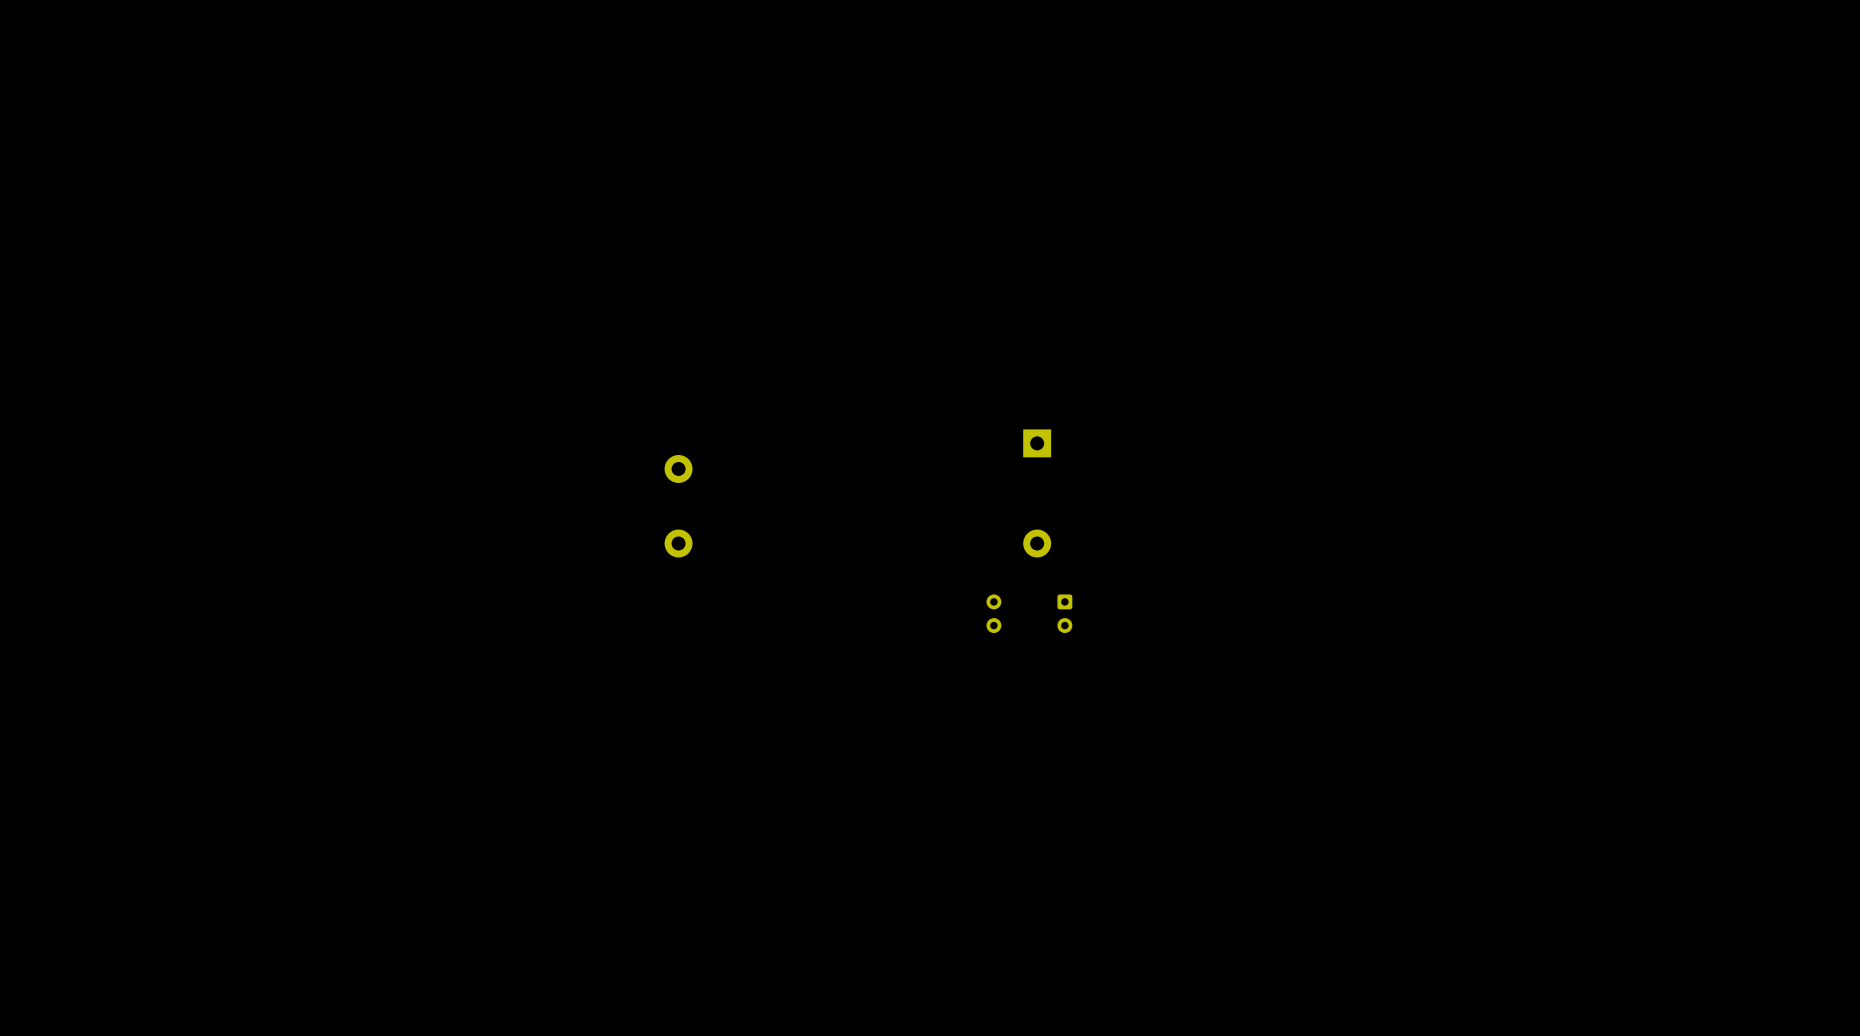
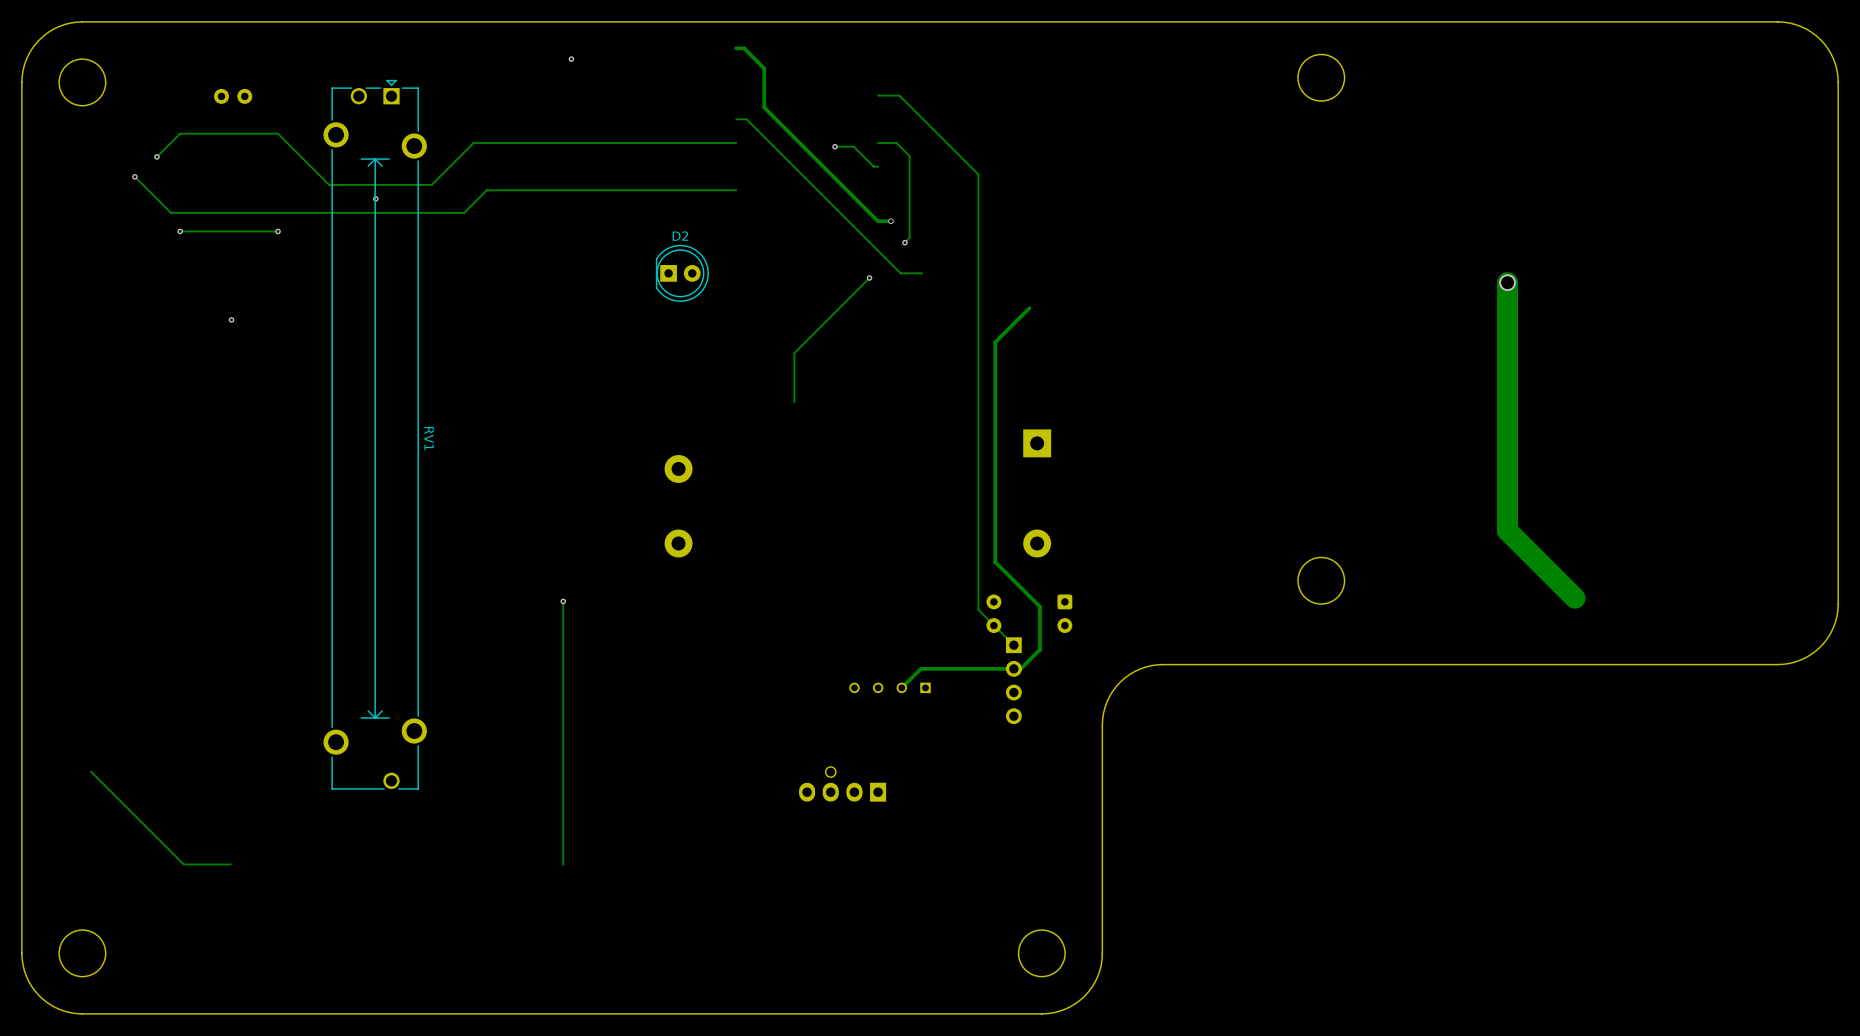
board edge: none -> (1777, 21) (82, 21) (70, 23) (53, 29) (39, 39) (29, 53) (23, 70) (21, 82) (21, 953) (24, 970) (29, 981) (39, 996) (48, 1003) (64, 1011) (82, 1013) (1053, 1012) (1065, 1009) (1080, 1000) (1092, 986) (1099, 970) (1102, 953) (1102, 719) (1106, 701) (1116, 686) (1129, 674) (1139, 669) (1162, 664) (1777, 664) (1789, 663) (1806, 657) (1820, 646) (1828, 637) (1833, 627) (1837, 609) (1838, 82) (1833, 59) (1820, 39) (1800, 26) (1777, 21)
track: none -> (736, 48) (744, 48) (764, 68) (764, 107) (877, 221) (890, 221)
round board edge: none -> [1297, 54, 1345, 102]
round board edge: none -> [58, 58, 106, 106]
via: none -> (571, 59)
track: none -> (878, 95) (899, 95) (978, 174) (978, 609) (1013, 645)
part: none -> (233, 96)
track: none -> (736, 119) (746, 119) (900, 273) (922, 273)
track: none -> (736, 142) (473, 142) (431, 184) (329, 184) (278, 133) (180, 133) (156, 156)
track: none -> (878, 142) (896, 142) (909, 156) (909, 237) (904, 242)
track: none -> (835, 146) (853, 146) (873, 166) (878, 166)
via: none -> (835, 146)
via: none -> (156, 156)
track: none -> (134, 176) (170, 212) (464, 212) (486, 190) (736, 190)
via: none -> (134, 176)
via: none -> (375, 198)
via: none -> (890, 221)
via: none -> (180, 231)
track: none -> (278, 231) (180, 231)
via: none -> (278, 231)
via: none -> (904, 242)
D2: none -> (682, 273)
track: none -> (869, 278) (794, 353) (794, 402)
via: none -> (869, 278)
track: none -> (1507, 282) (1507, 530) (1575, 598)
via: none -> (1507, 282)
track: none -> (1029, 308) (995, 342) (995, 562) (1039, 606) (1039, 649) (1020, 668) (920, 668) (901, 687)
via: none -> (231, 319)
RV1: none -> (375, 434)
round board edge: none -> [1297, 557, 1345, 605]
track: none -> (563, 601) (563, 864)
via: none -> (563, 601)
part: none -> (1013, 680)
part: none -> (890, 687)
track: none -> (91, 771) (183, 864) (230, 864)
part: none -> (842, 784)
round board edge: none -> [58, 929, 106, 977]
round board edge: none -> [1018, 929, 1066, 977]

